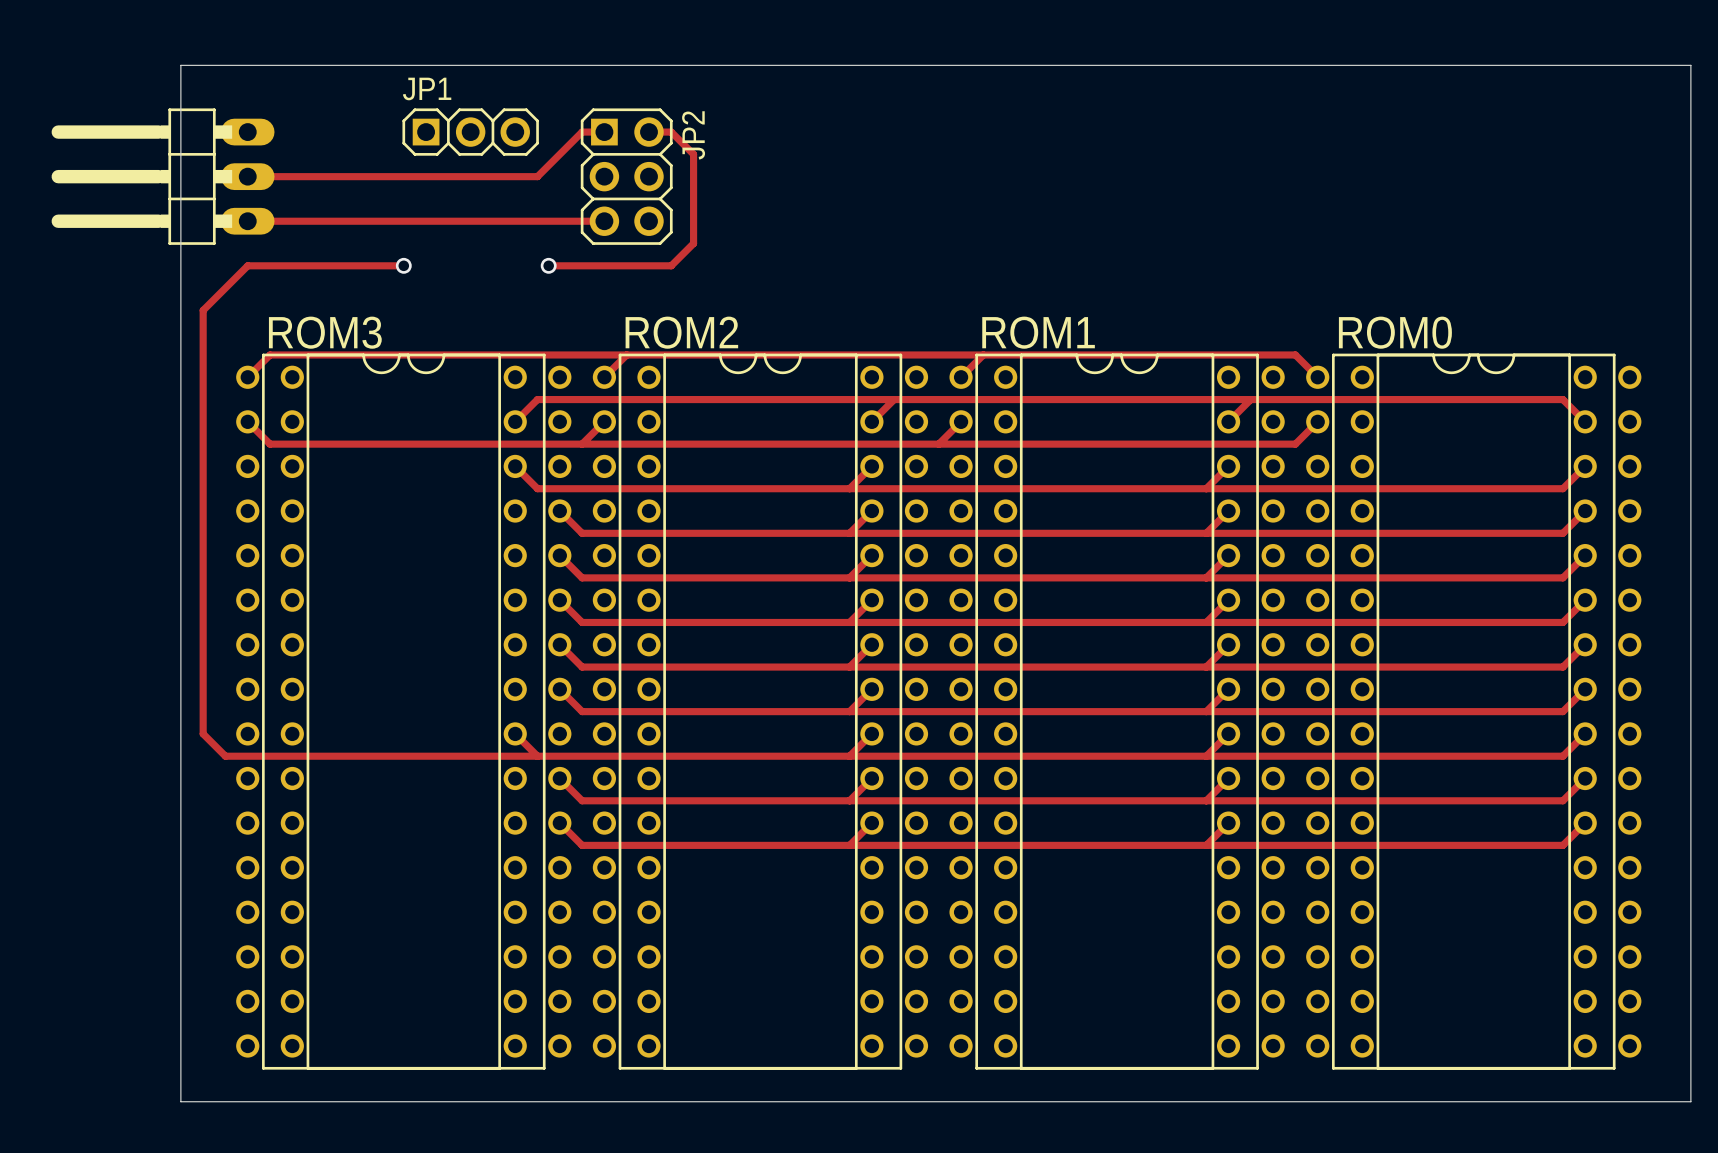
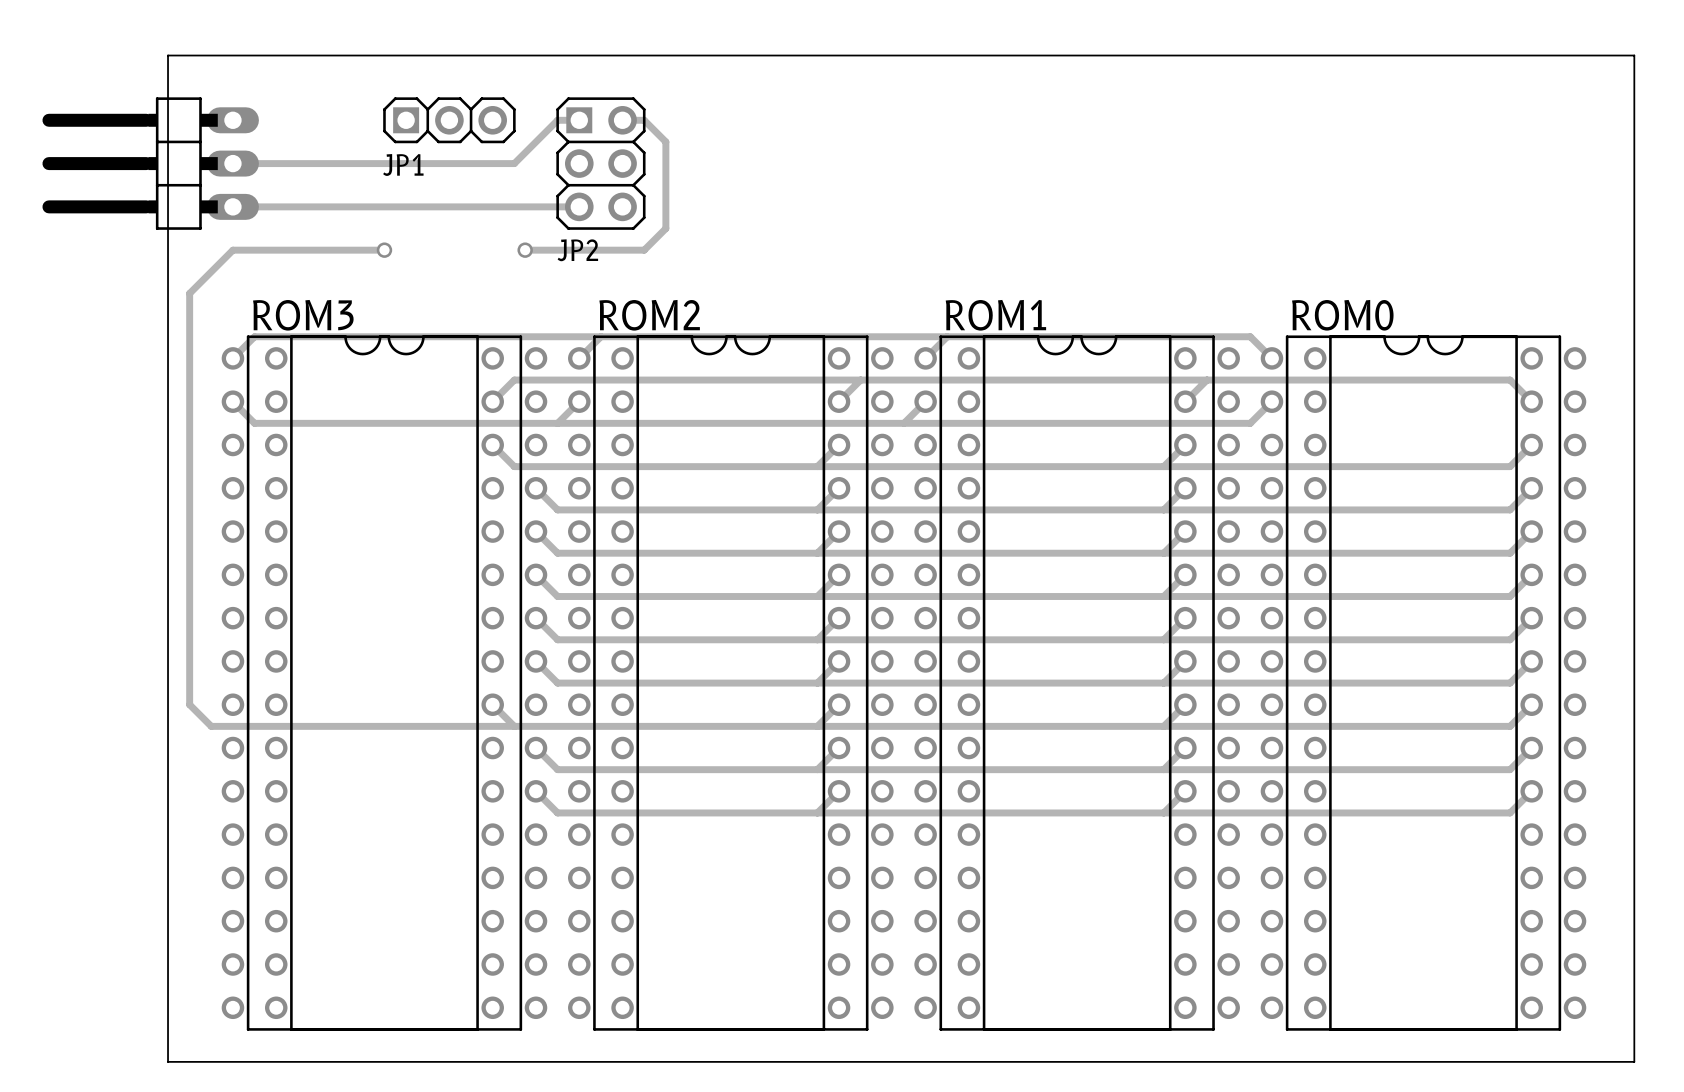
JP1 name position: JP1 (427, 88) -> JP1 (403, 165)
JP2 name rotation: 0° (693, 135) -> 90° clockwise (577, 250)
JP2 name position: JP2 (693, 135) -> JP2 (577, 250)

